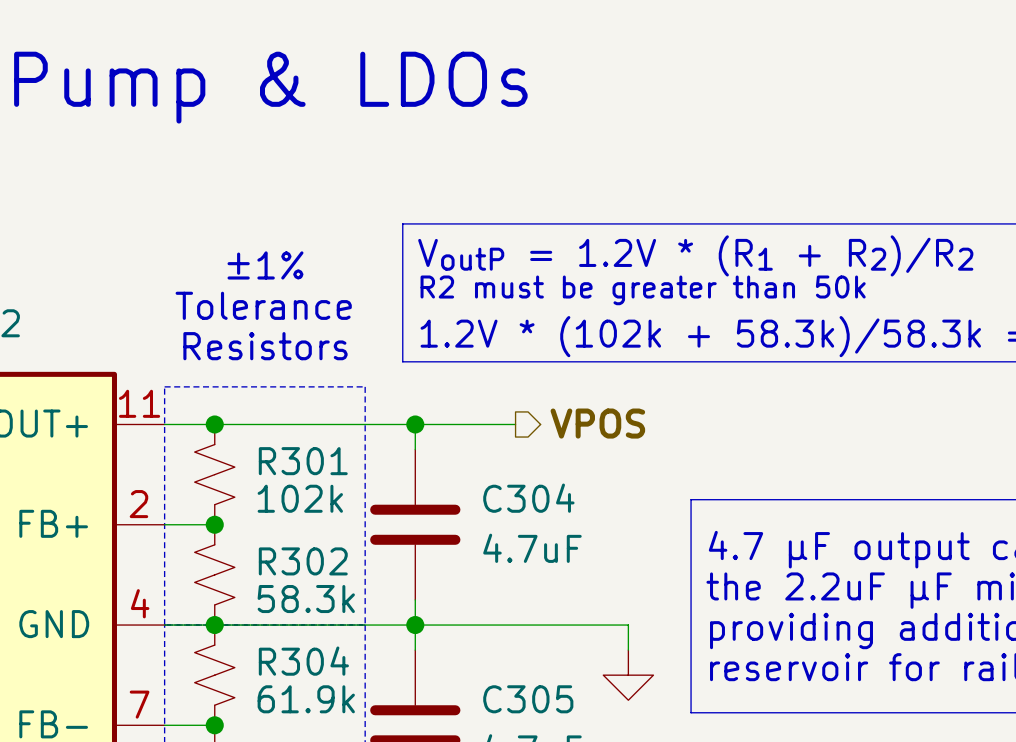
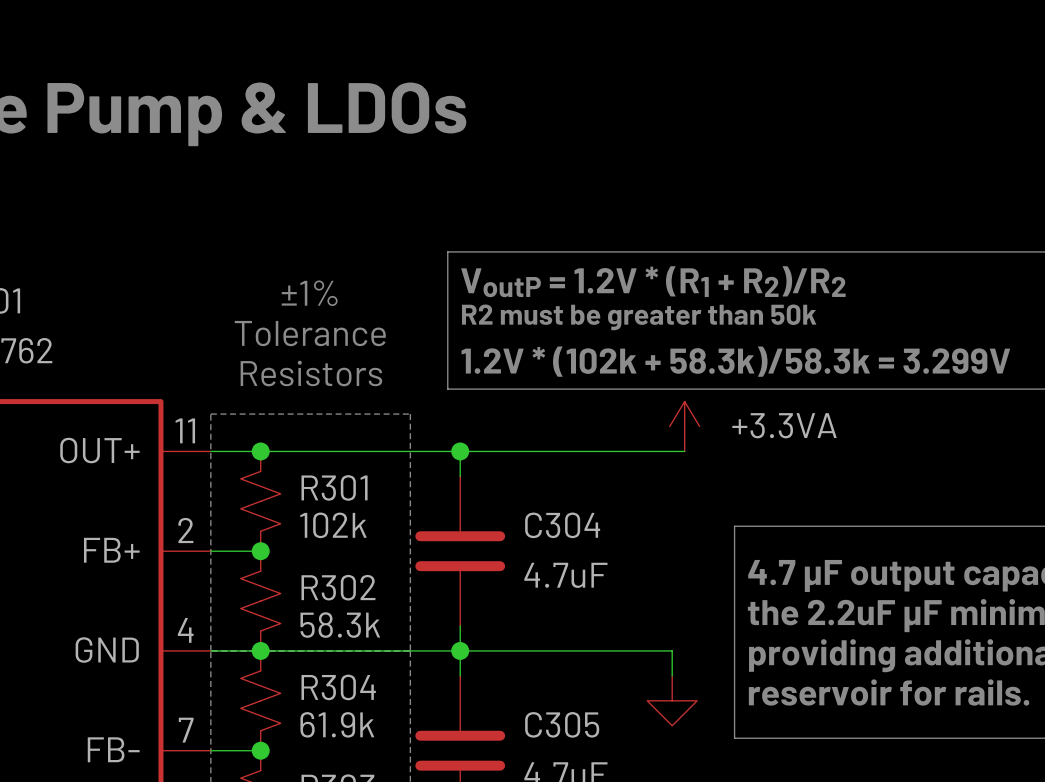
power symbol: none -> +3.3VA (684, 426)
hierarchical label: VPOS (597, 423) -> none
wire: none -> (559, 451) (684, 451)

